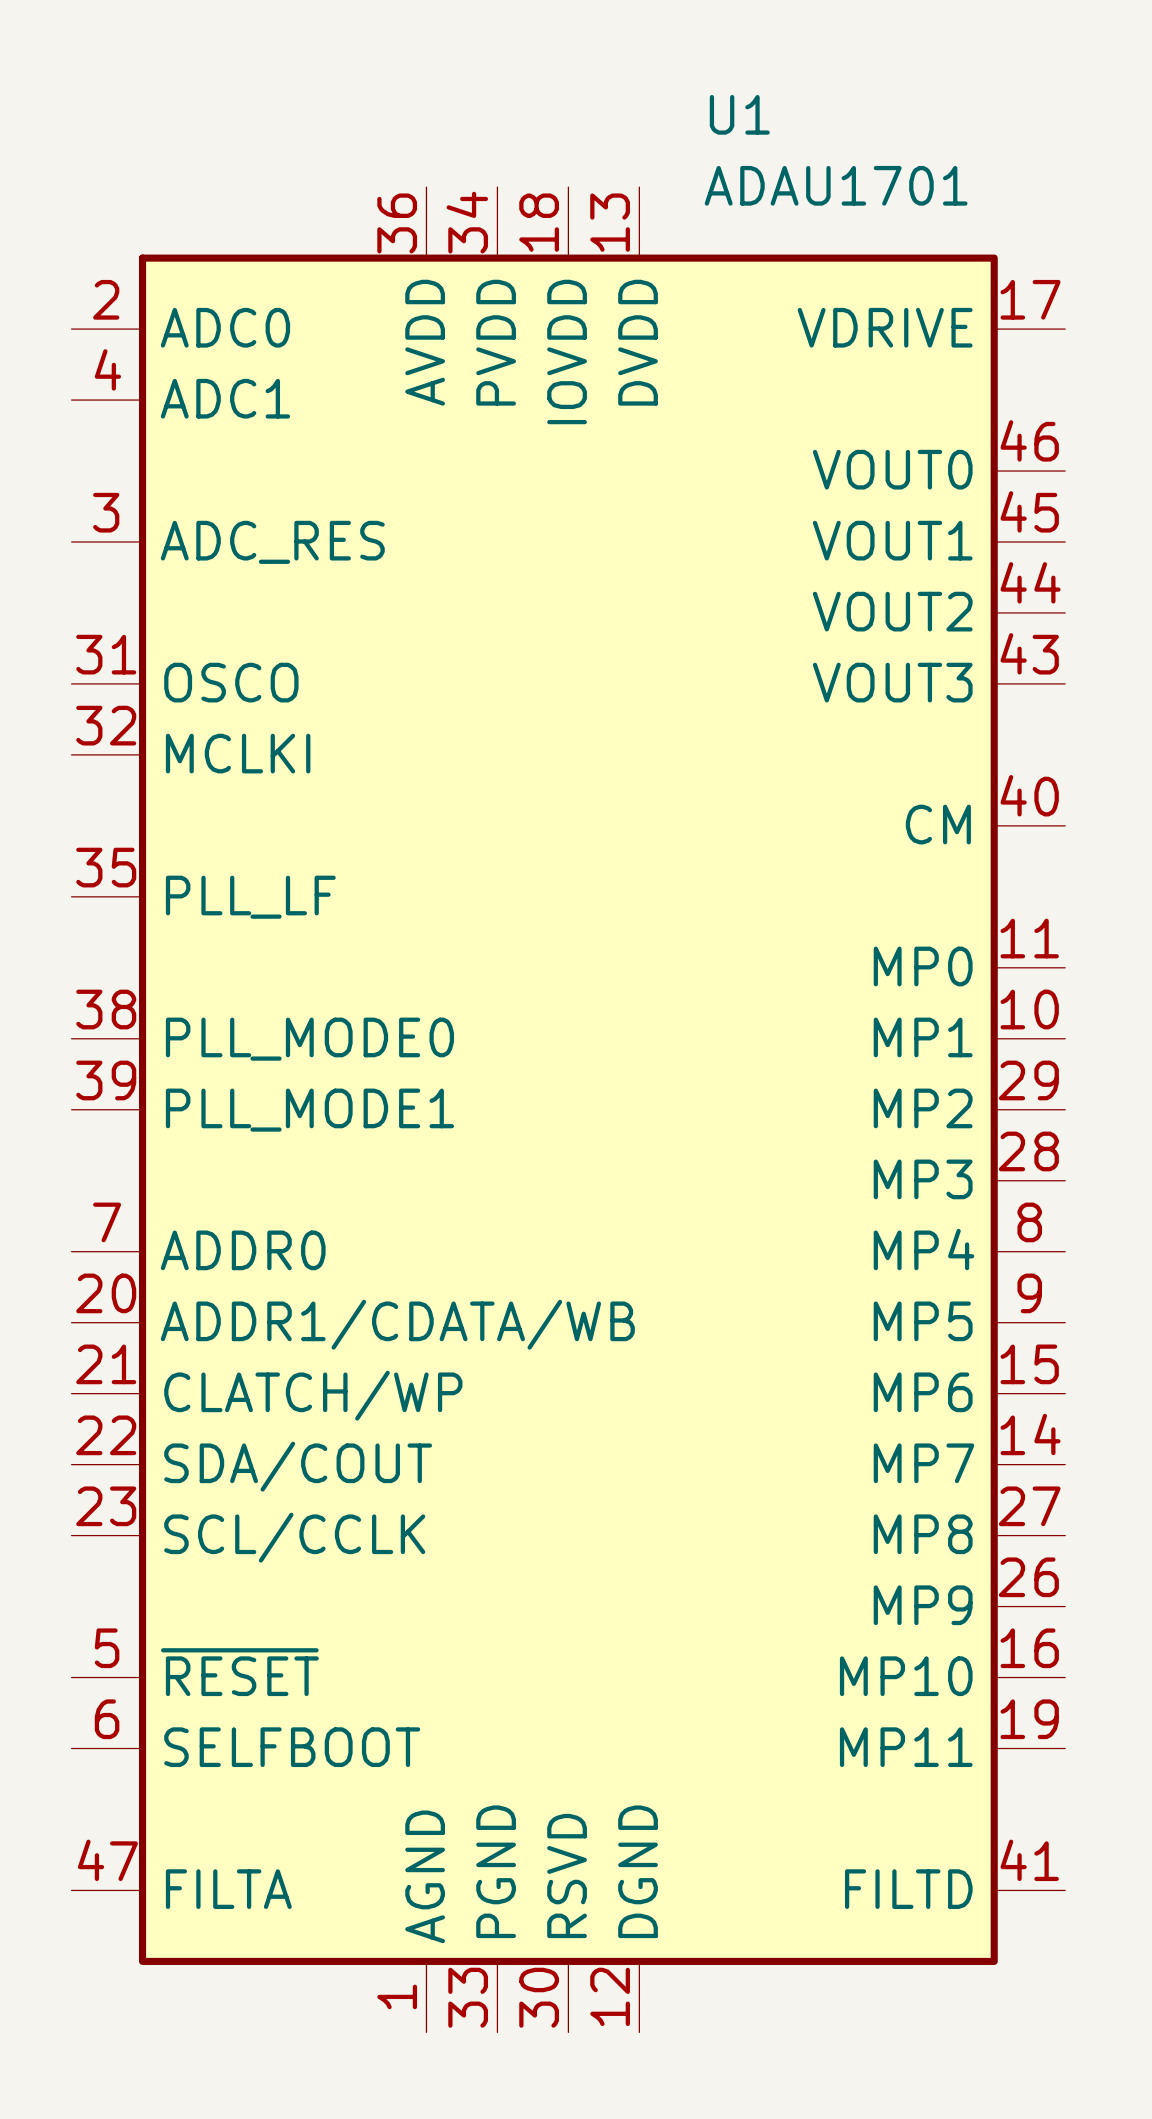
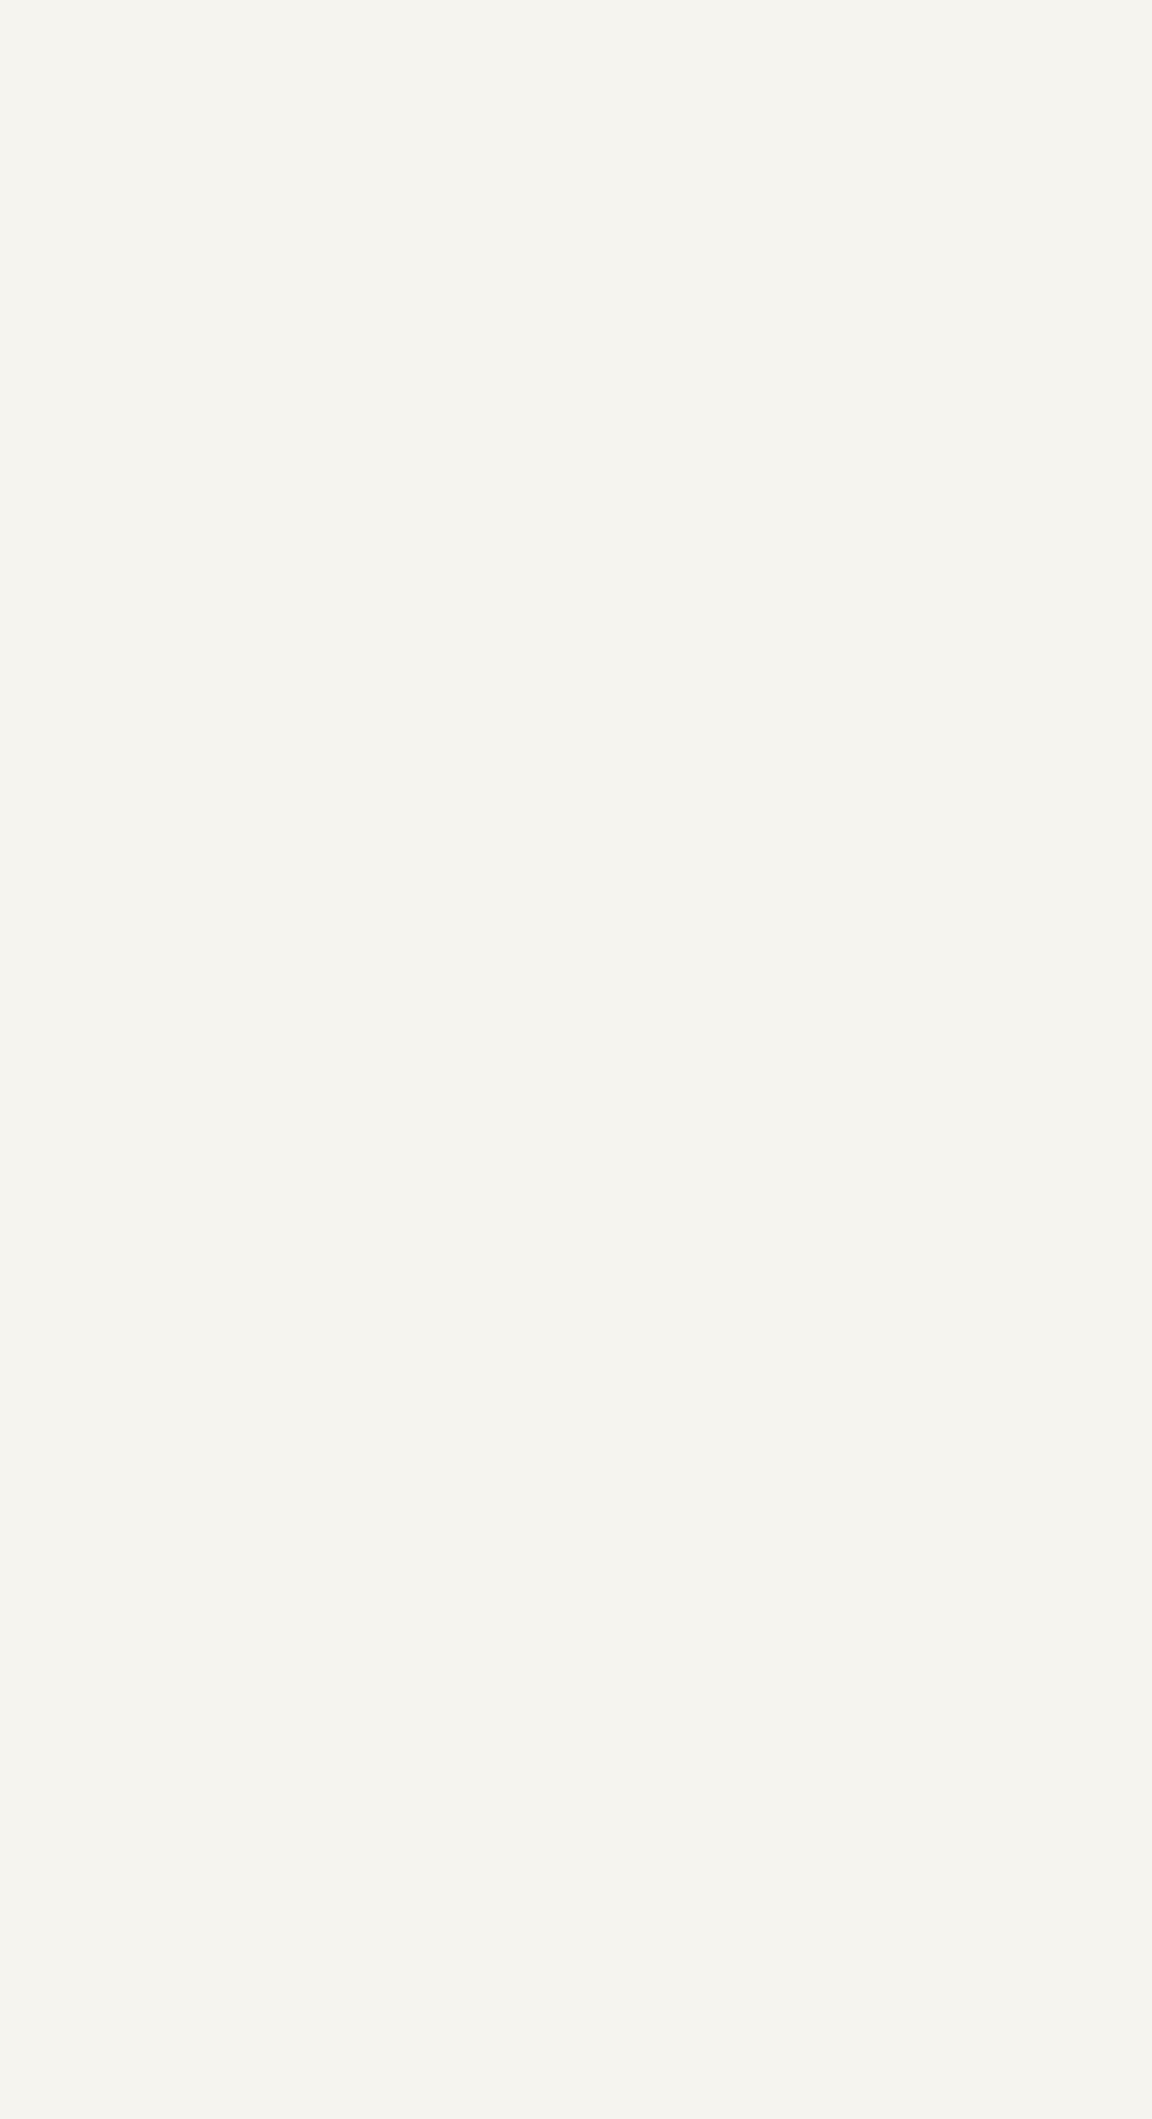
U1: ADAU1701 (568, 1109) -> none

